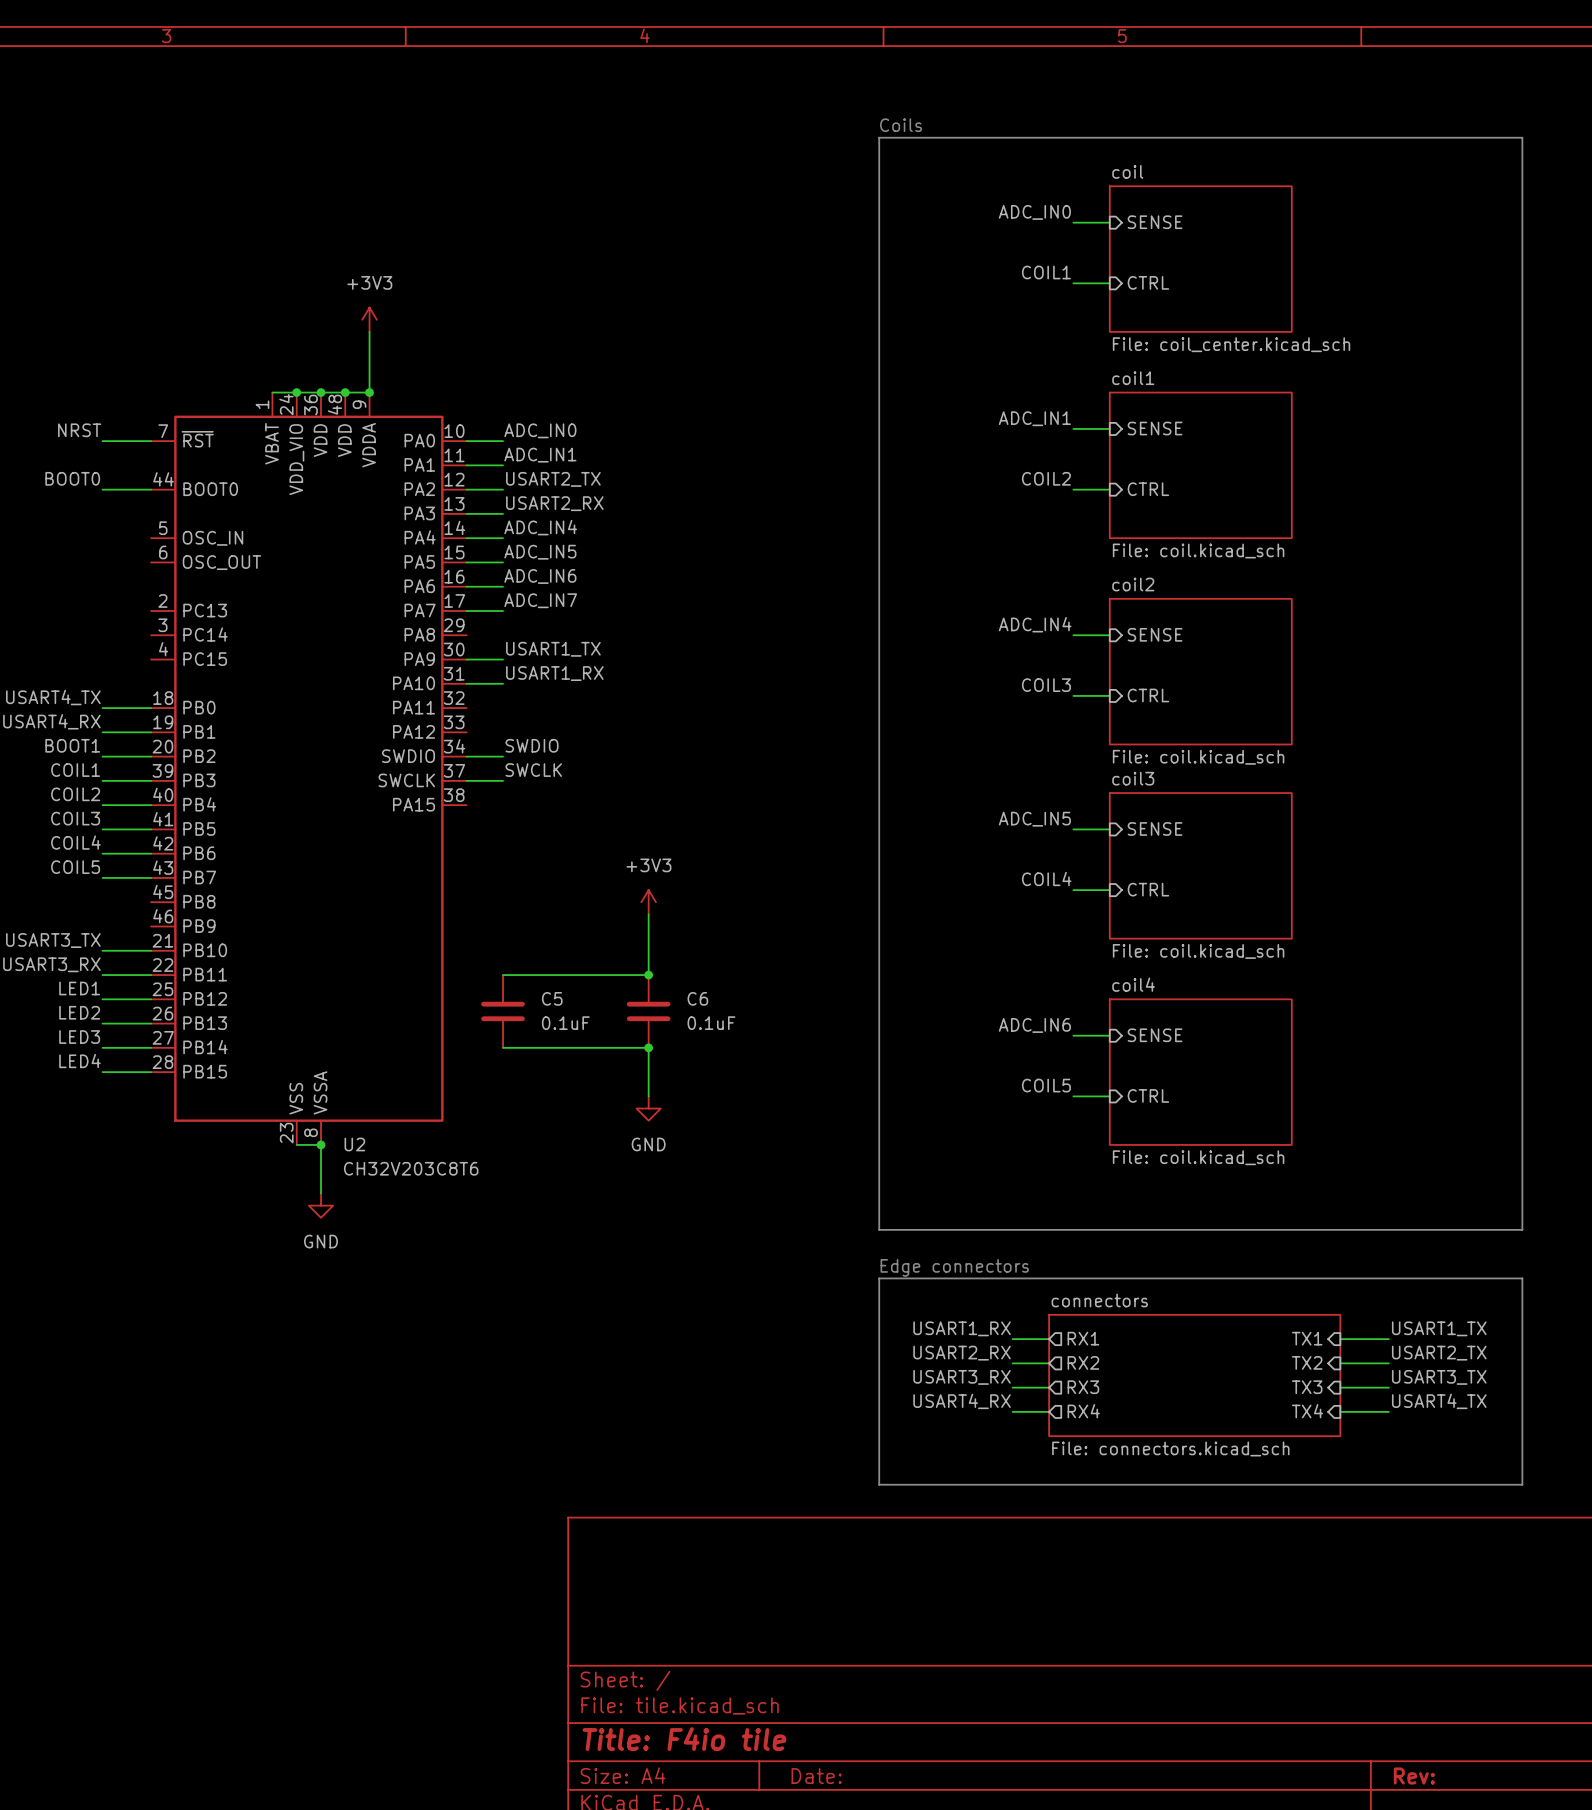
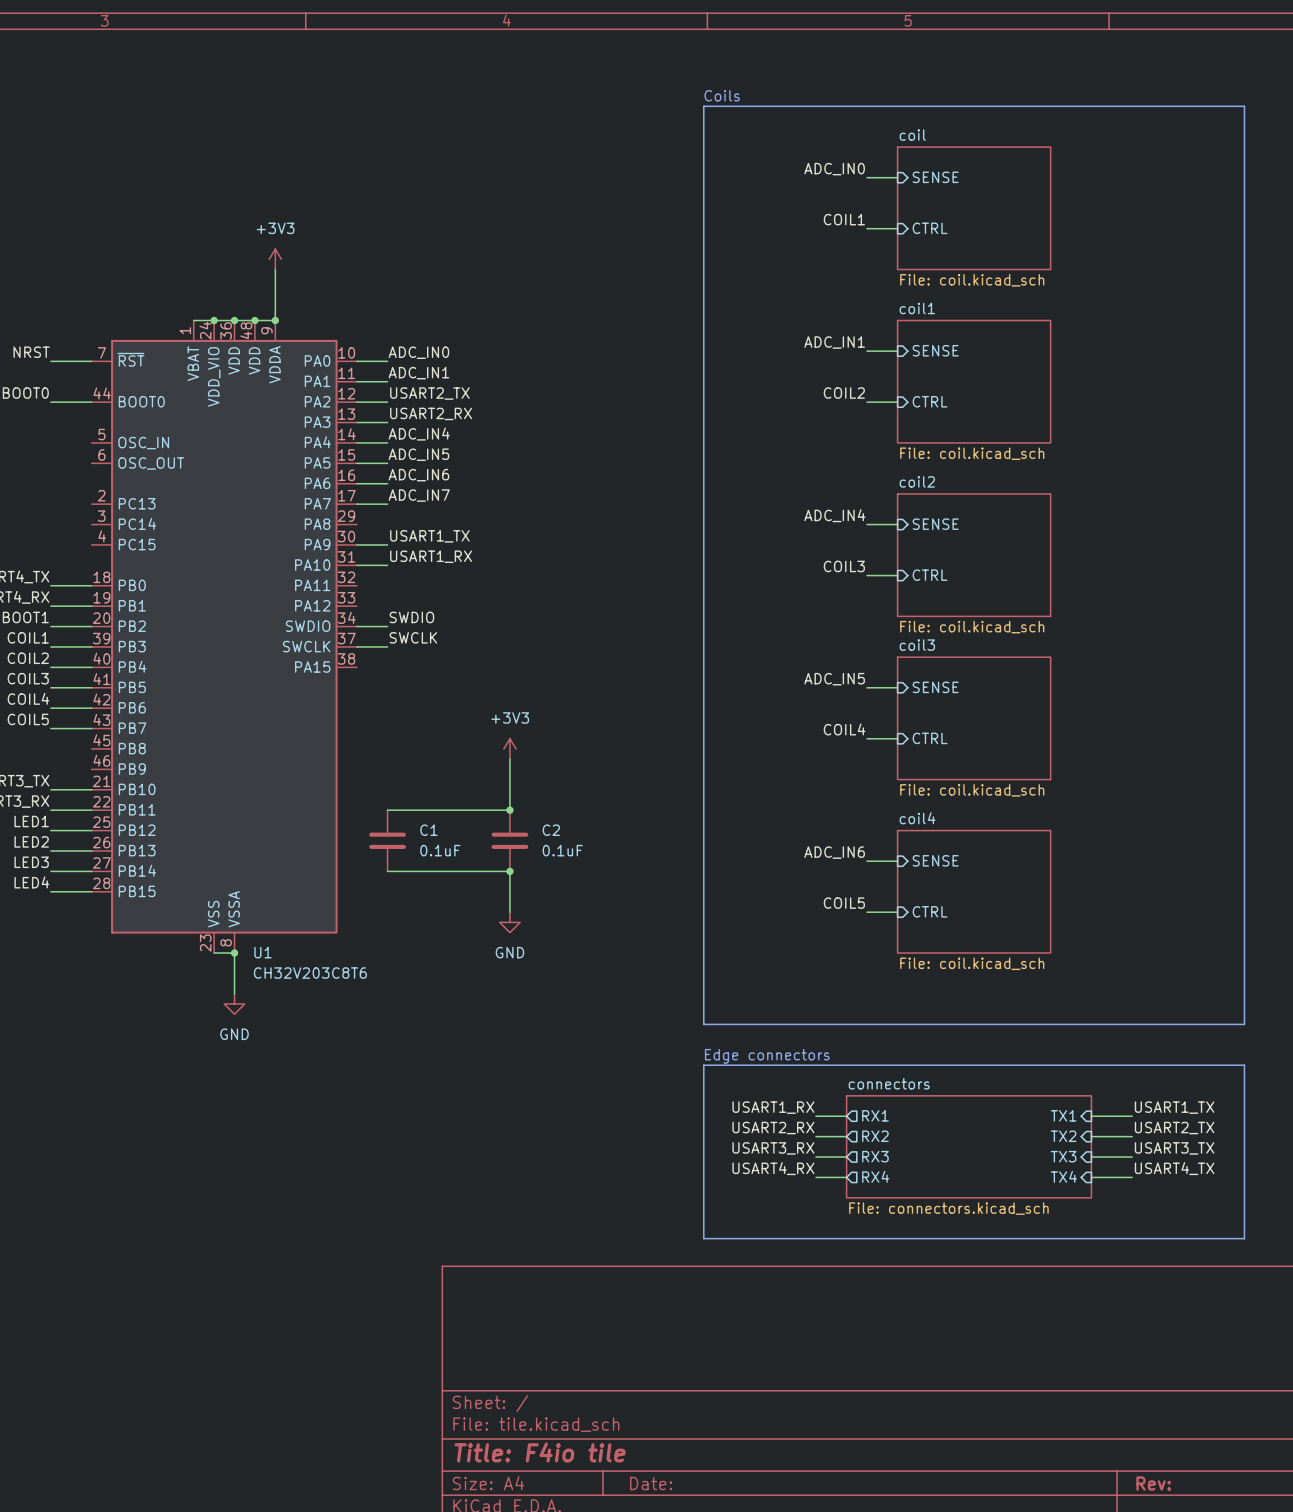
sheet coil value: File: coil_center.kicad_sch (1231, 344) -> File: coil.kicad_sch (972, 280)
C5 name: C5 (552, 998) -> C1 (428, 830)
C6 name: C6 (697, 998) -> C2 (551, 830)
U2 name: U2 (354, 1144) -> U1 (262, 952)

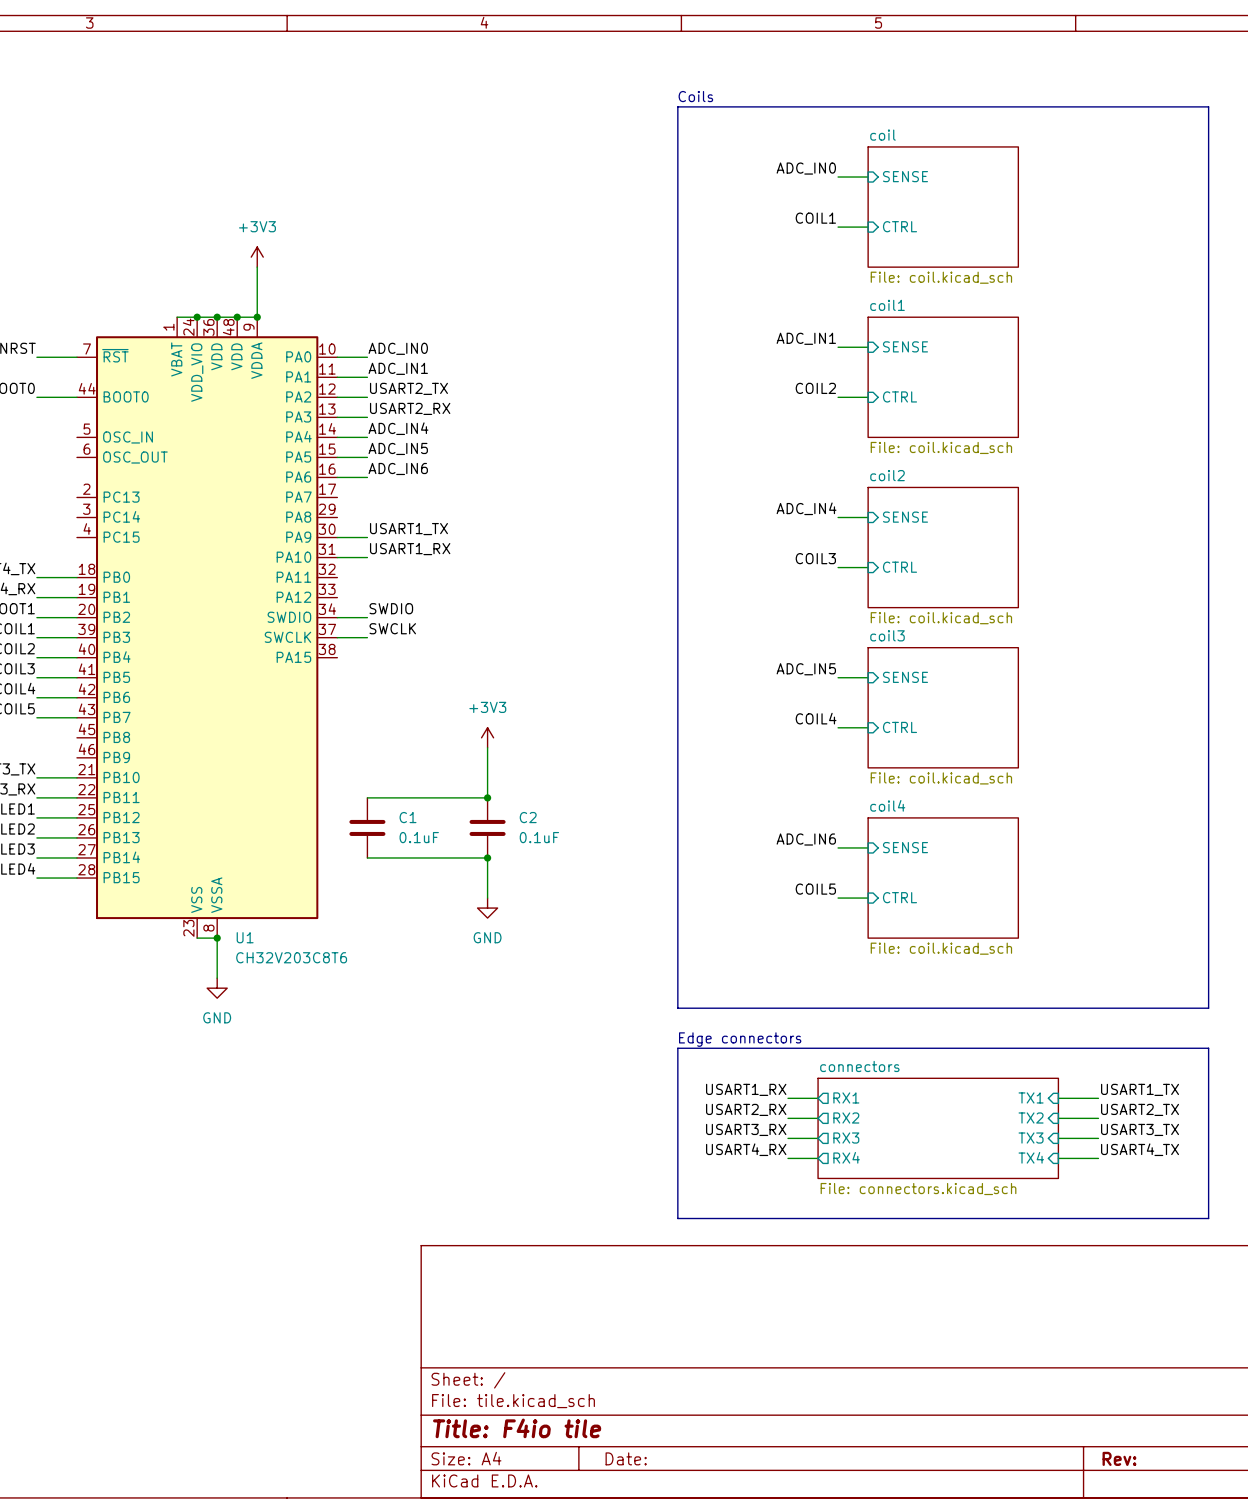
label: ADC_IN7 (419, 495) -> none
wire: (356, 504) (387, 504) -> none

